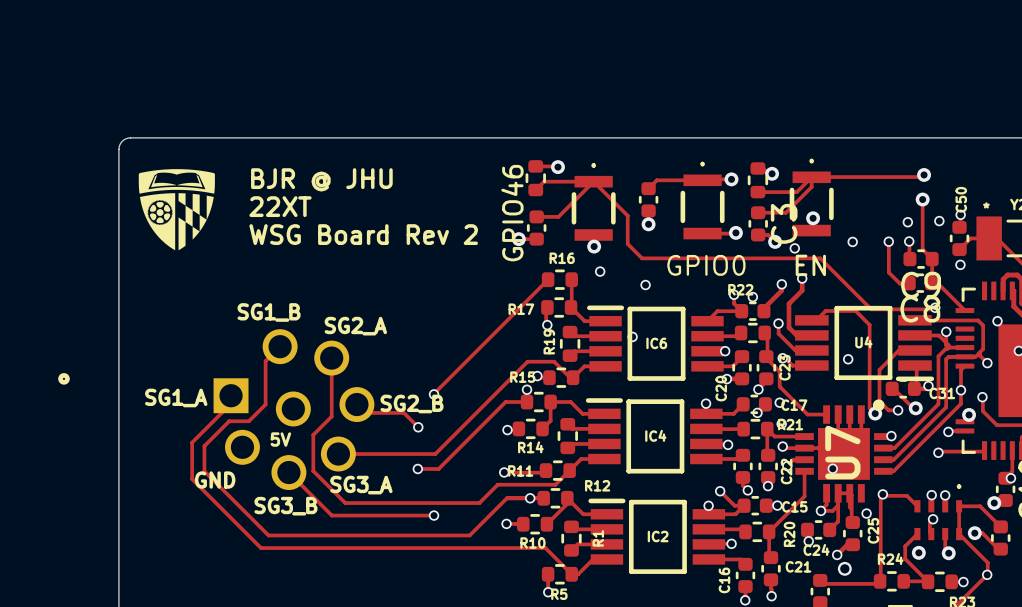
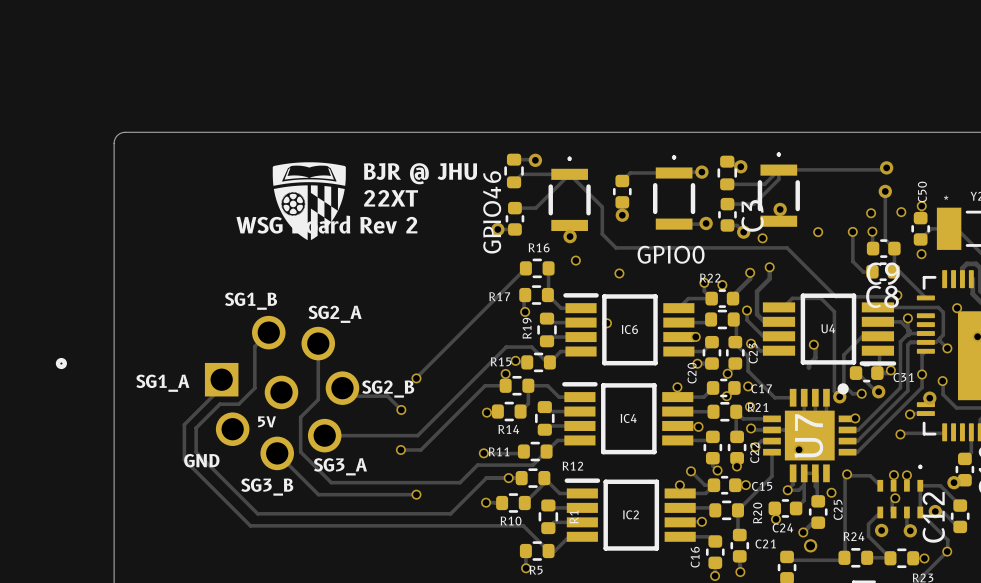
text position: BJR @ JHU (321, 179) -> BJR @ JHU (420, 173)
text position: 22XT (280, 206) -> 22XT (391, 198)
drawing position: (176, 209) -> (309, 201)
text: EN (810, 265) -> none
track: none -> (815, 346) (815, 357) (809, 364) (809, 367)
via: (1010, 478) -> none
C12 name: none -> C12 (933, 517)

